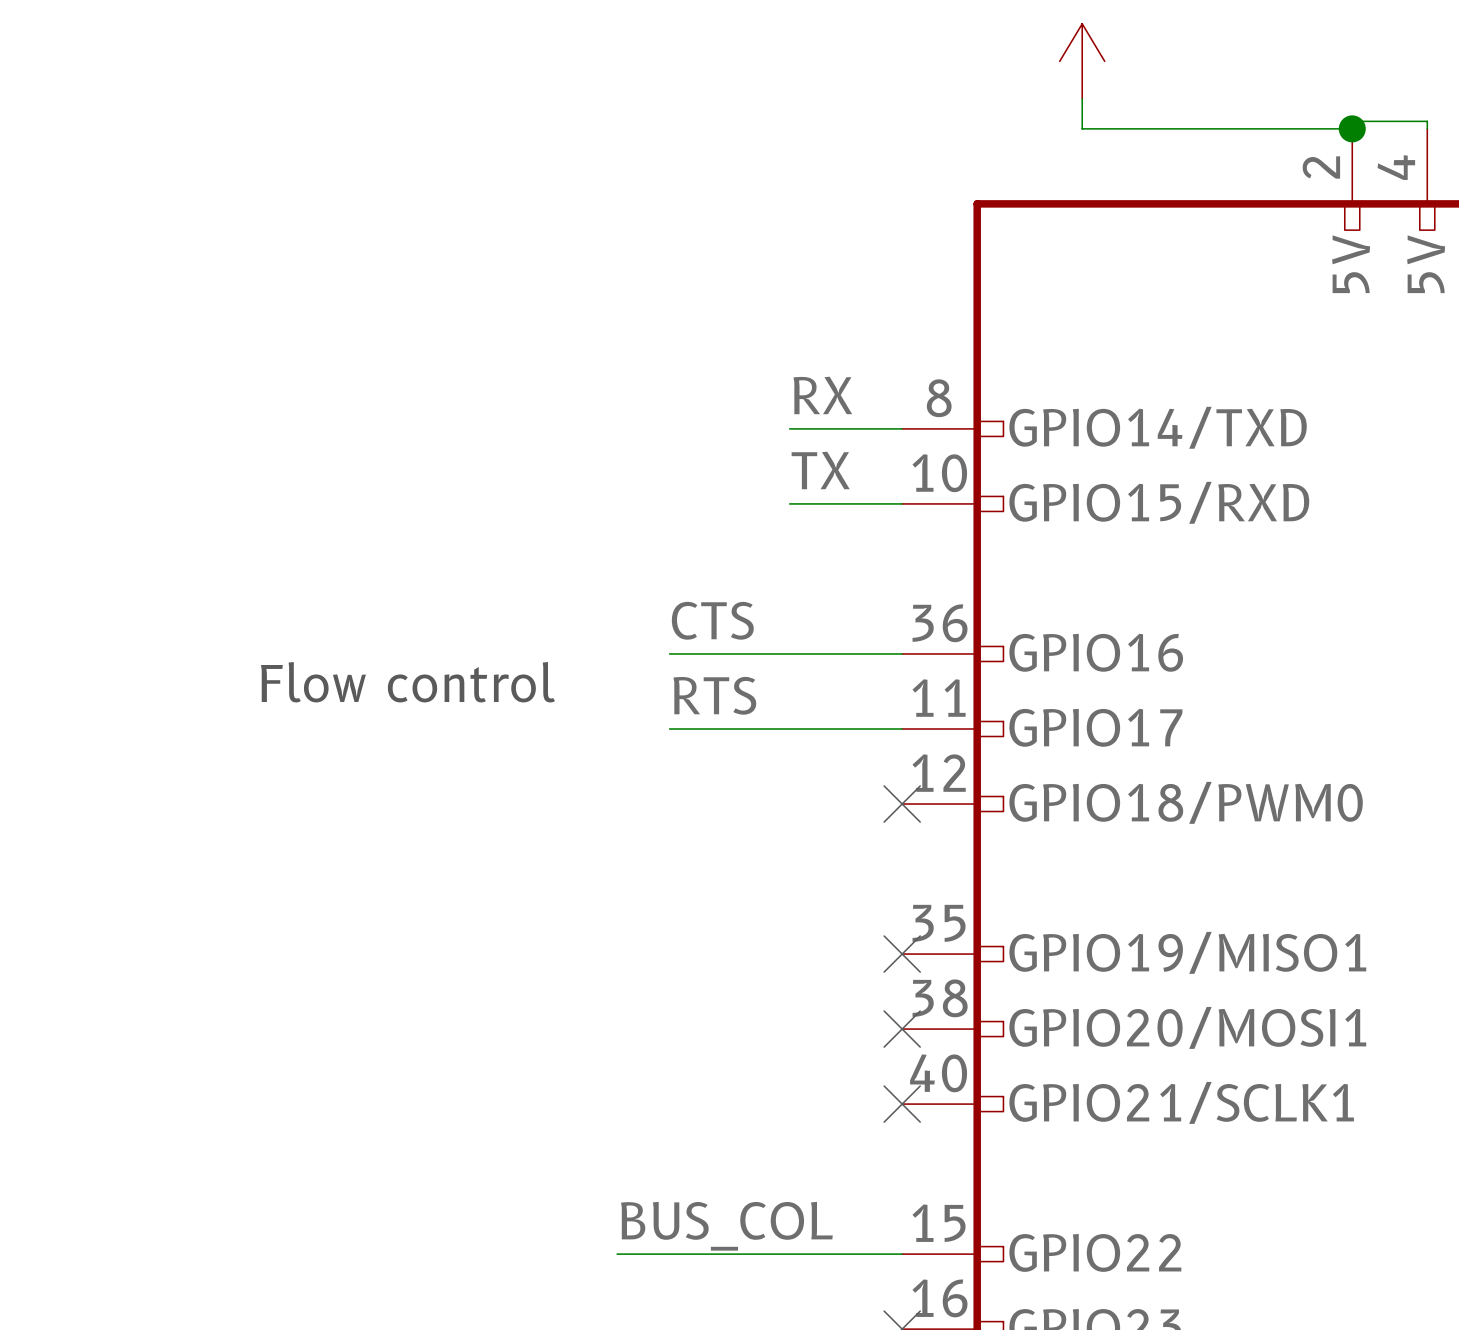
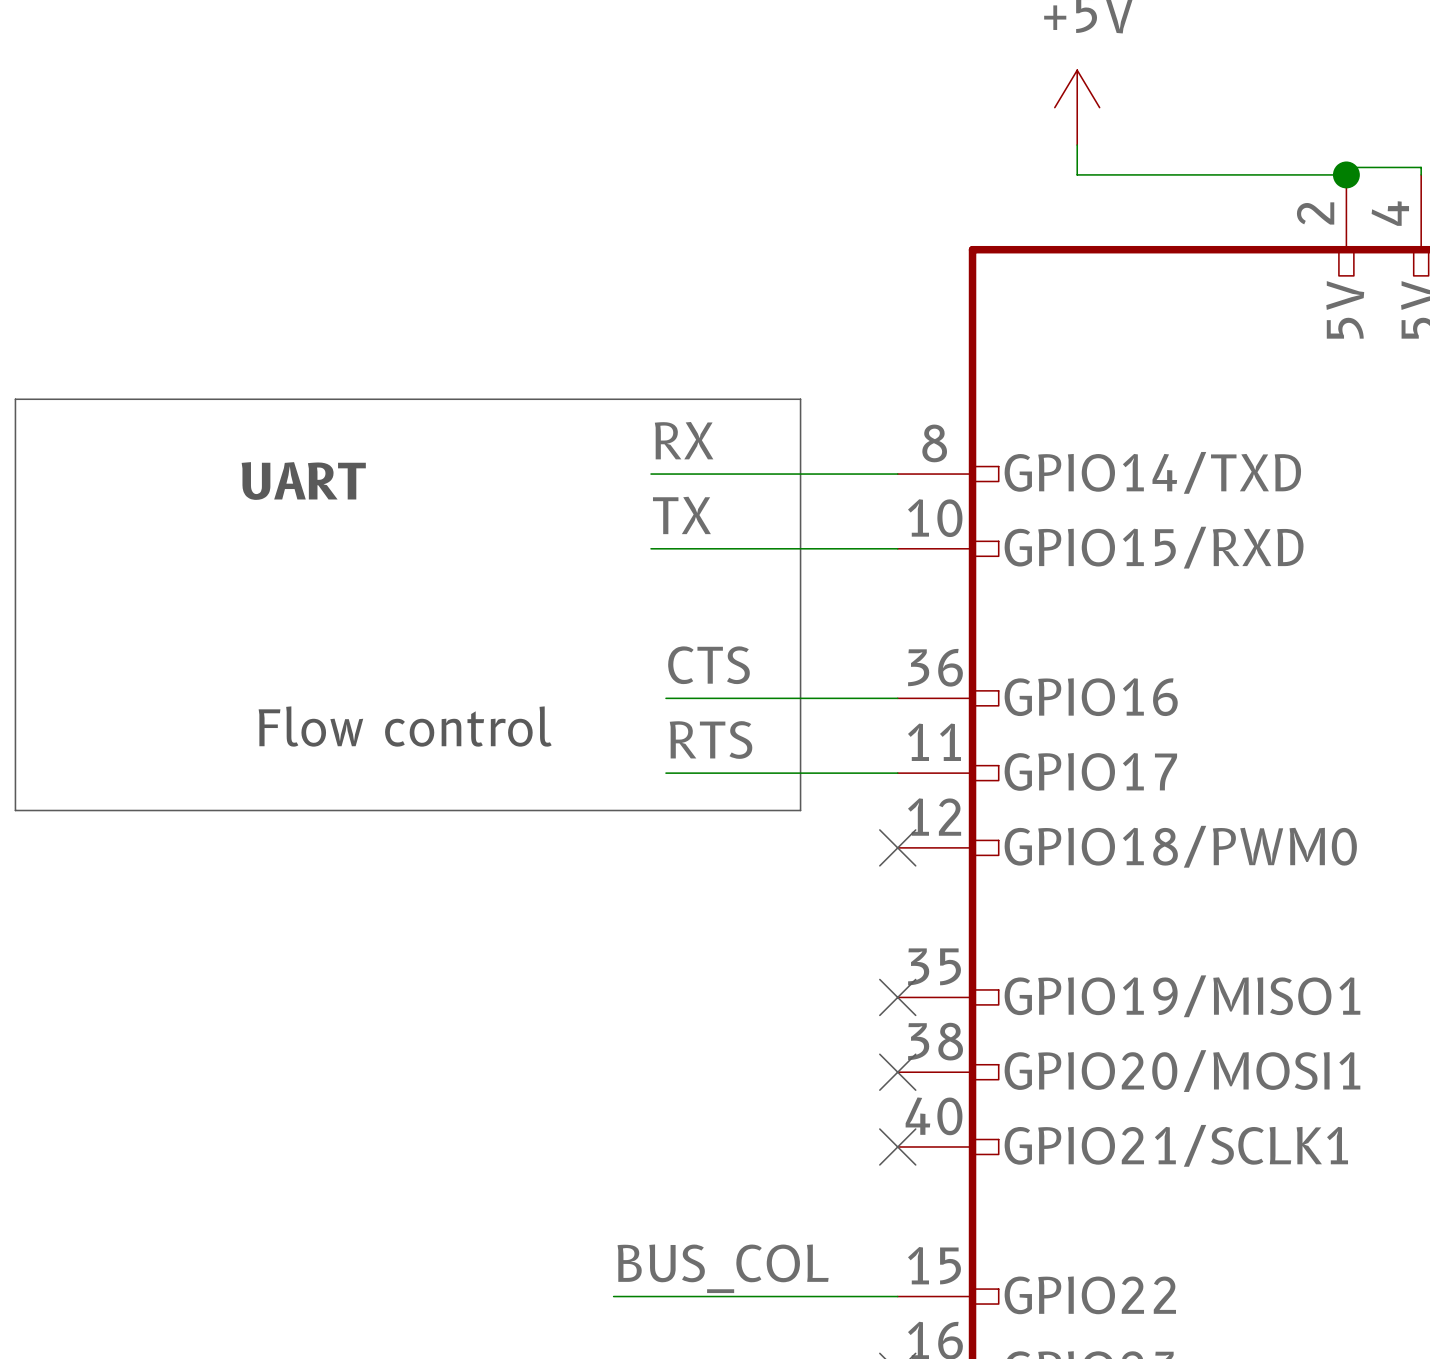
line: none -> (15, 399) (15, 810) (800, 810) (800, 399) (15, 399)
label position: RX (822, 395) -> RX (684, 440)
wire: none -> (651, 474) (785, 474)
text: none -> UART (303, 481)
label position: TX (820, 470) -> TX (681, 515)
wire: none -> (651, 548) (785, 548)

